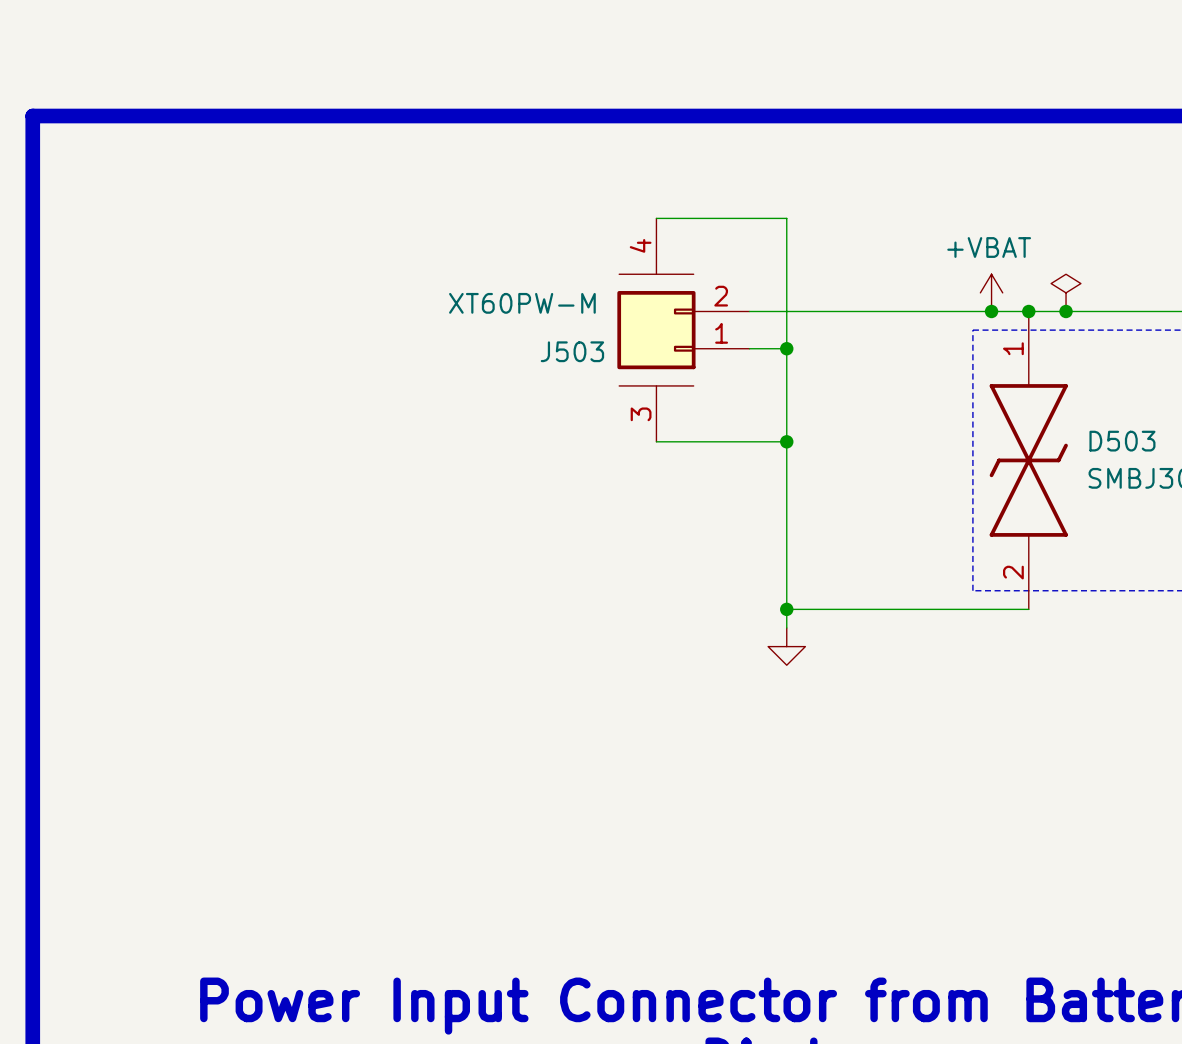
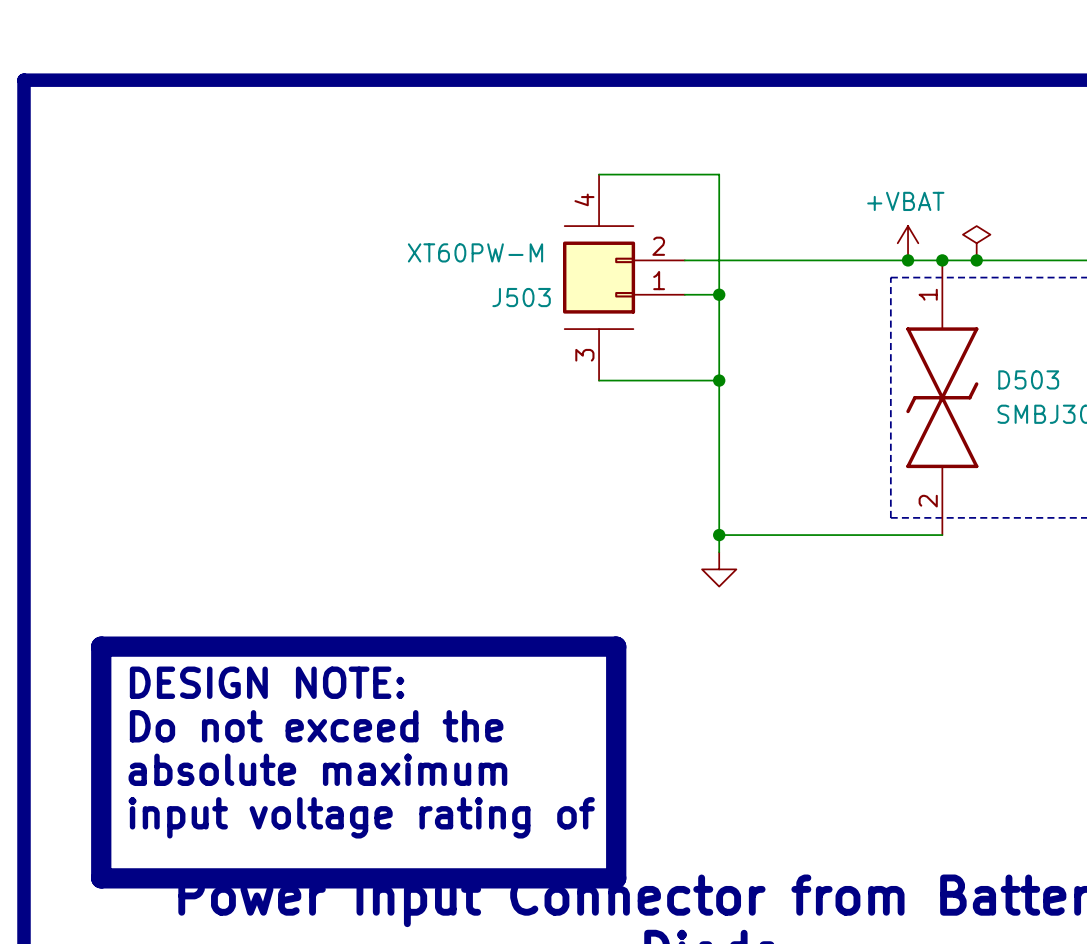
line: none -> (101, 646) (616, 646) (616, 878) (101, 878) (101, 646)
text: none -> DESIGN NOTE: (267, 682)
text: none -> Do not exceed the (316, 726)
text: none -> absolute maximum (317, 769)
text: none -> input voltage rating of (361, 817)

